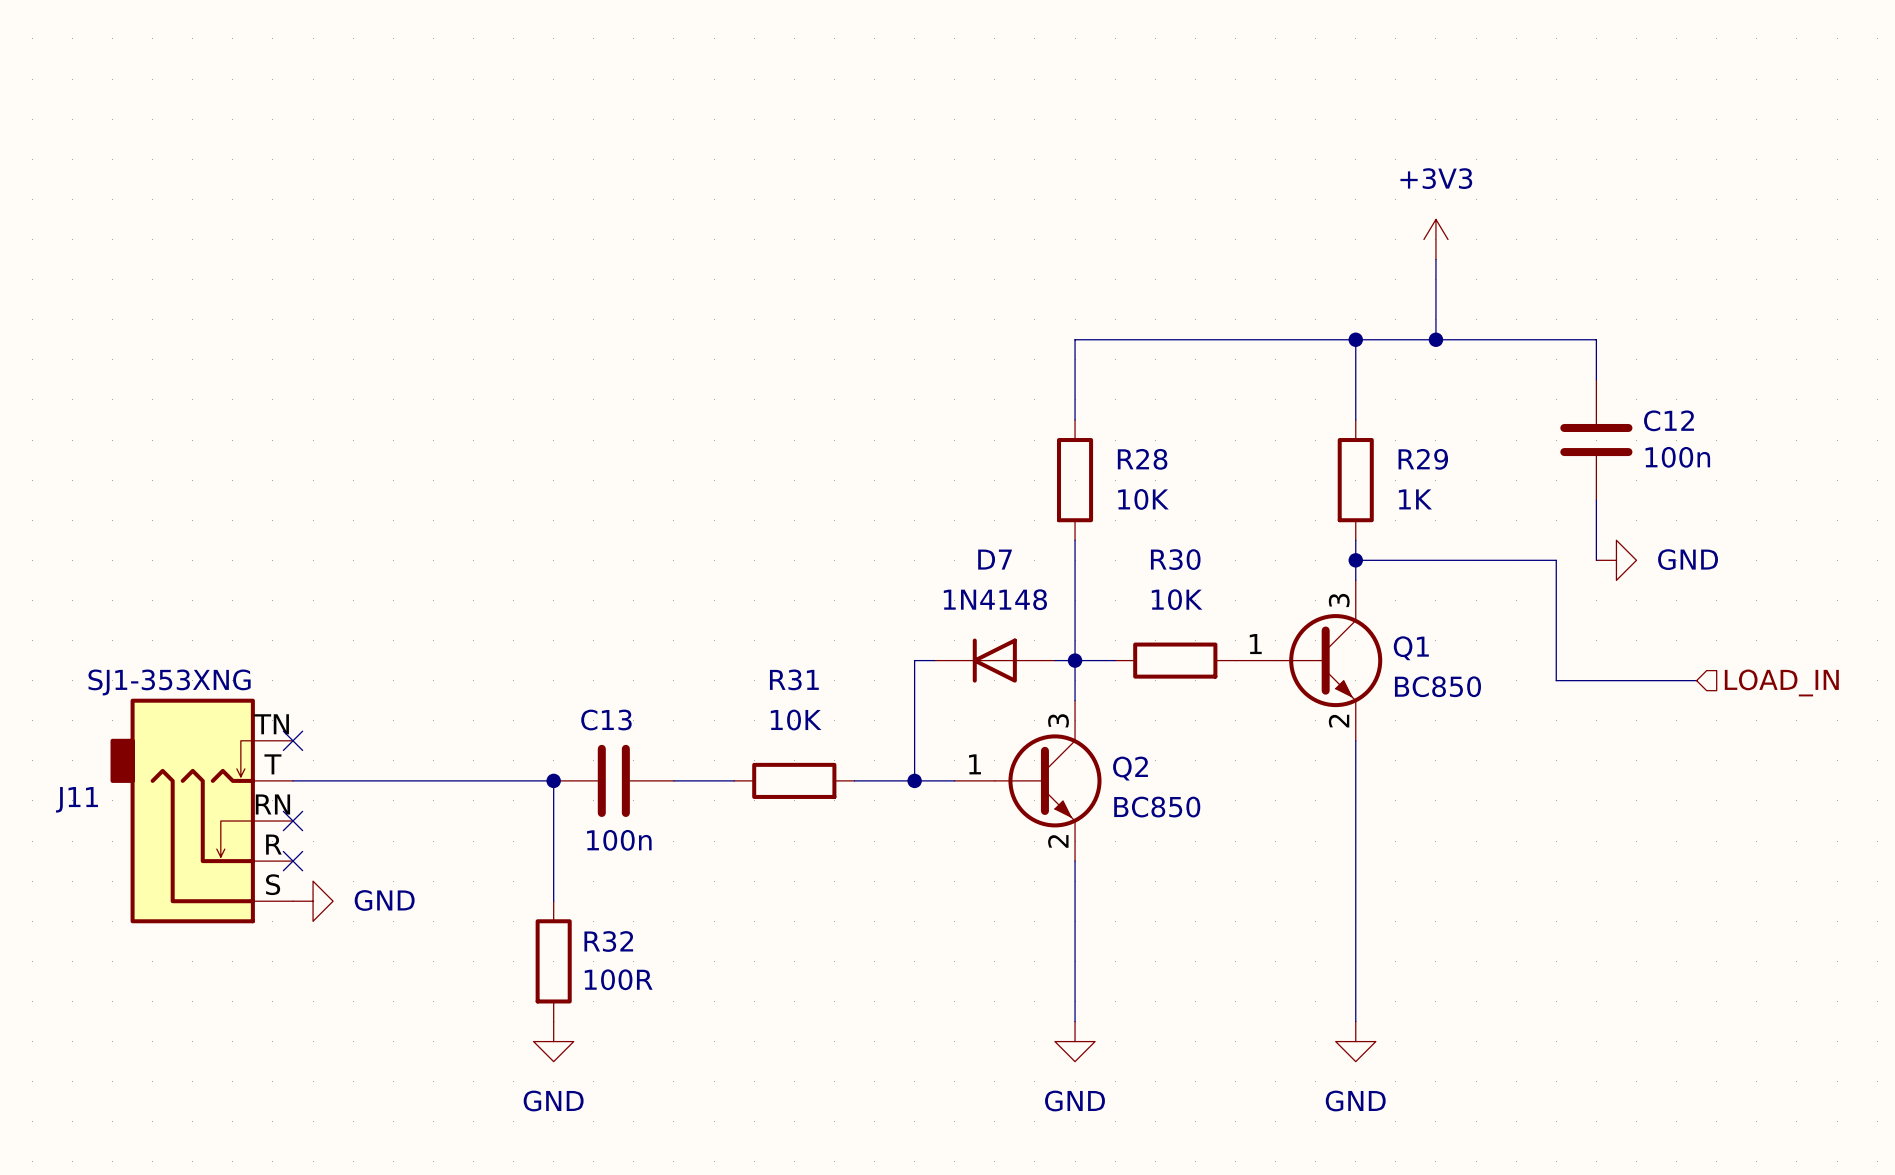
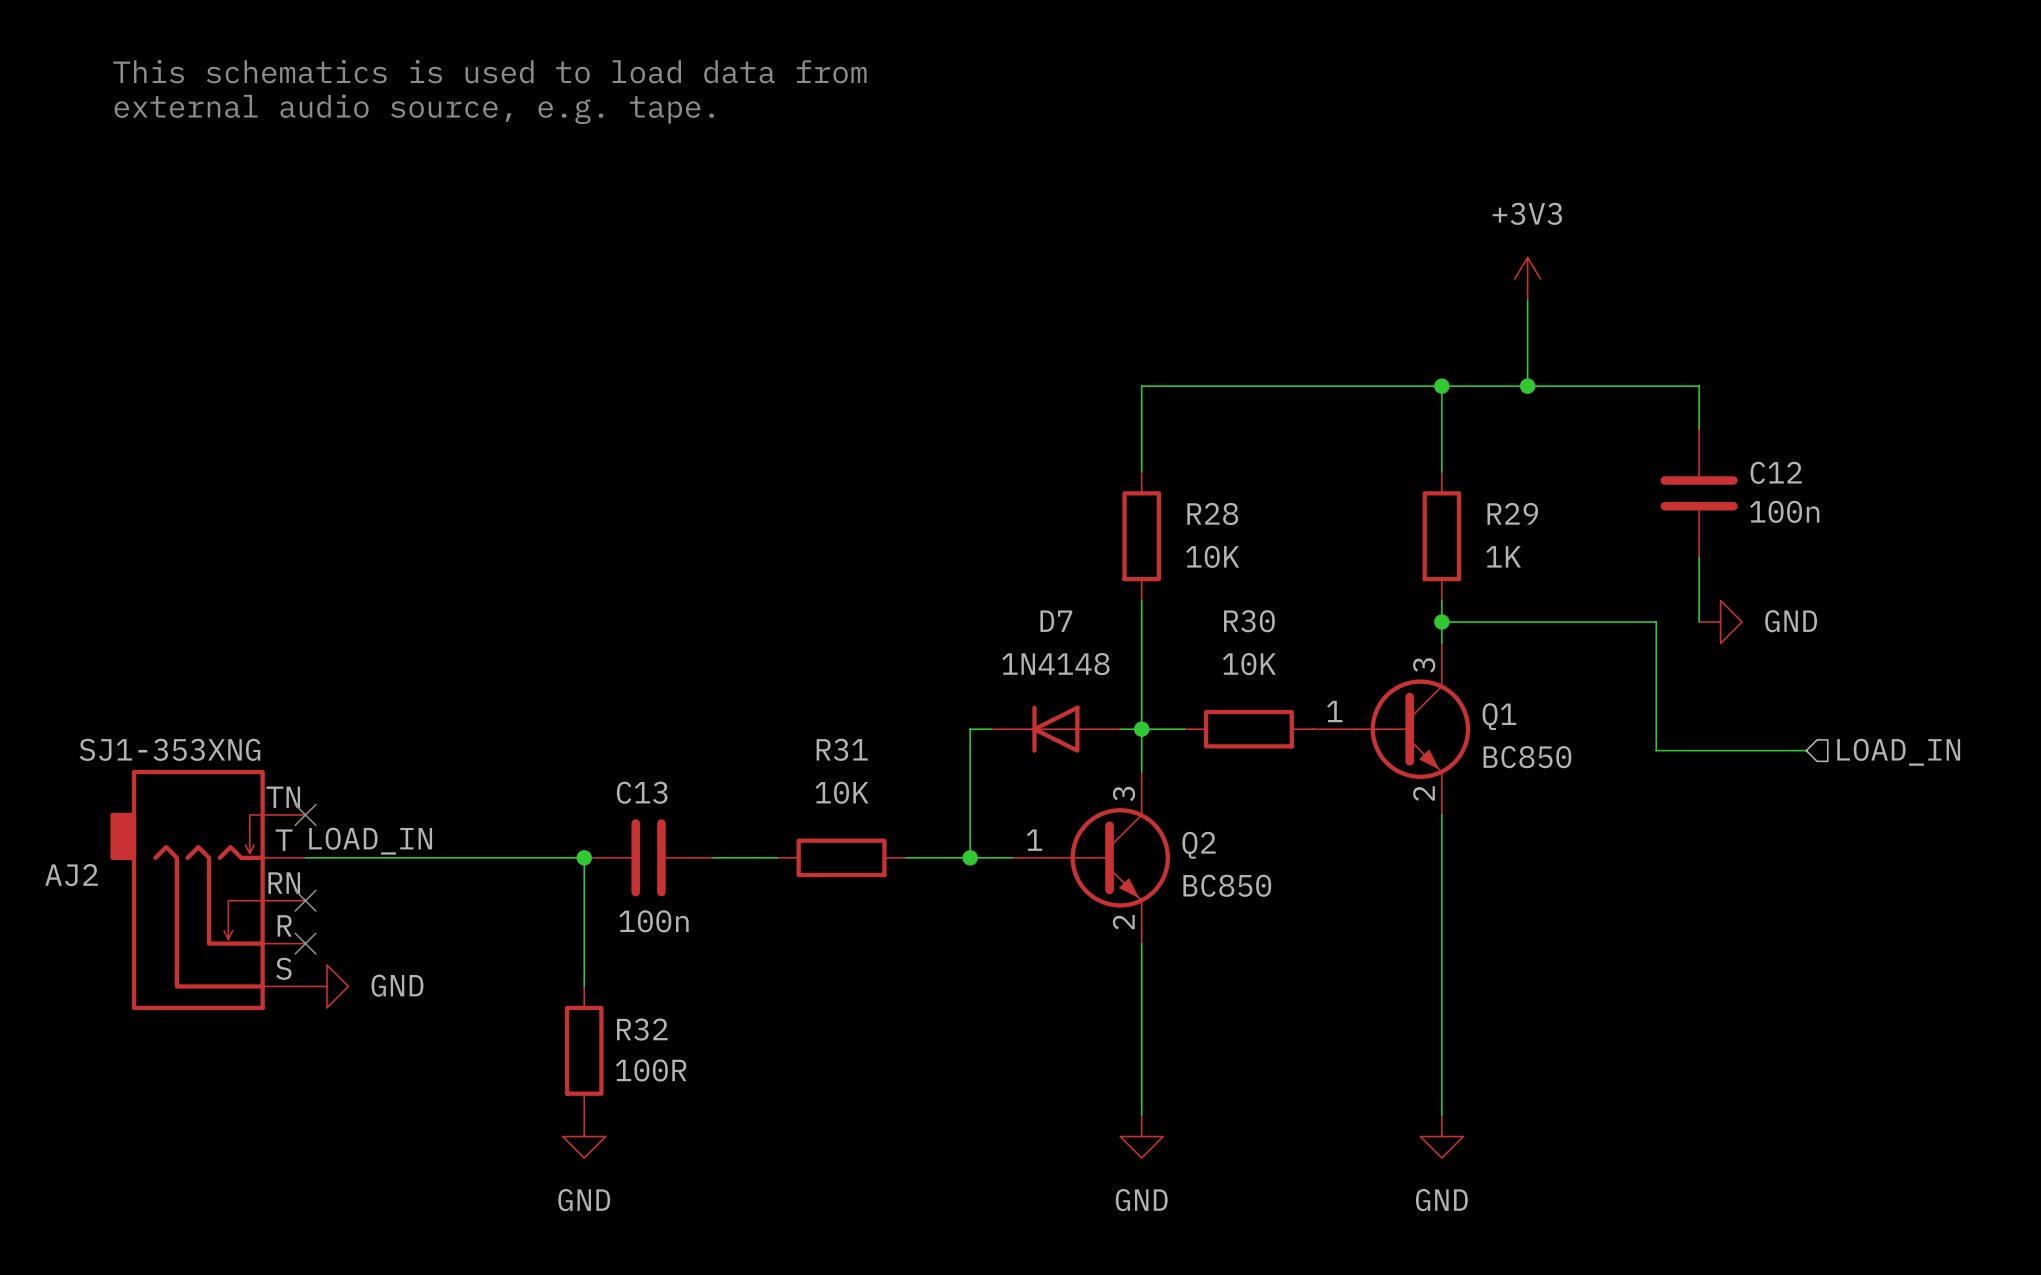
text: none -> This schematics is used to load data from (489, 71)
text: none -> external audio source, e.g. tape. (414, 109)
label: none -> LOAD_IN (370, 841)
J11 name: J11 (76, 799) -> AJ2 (71, 875)

